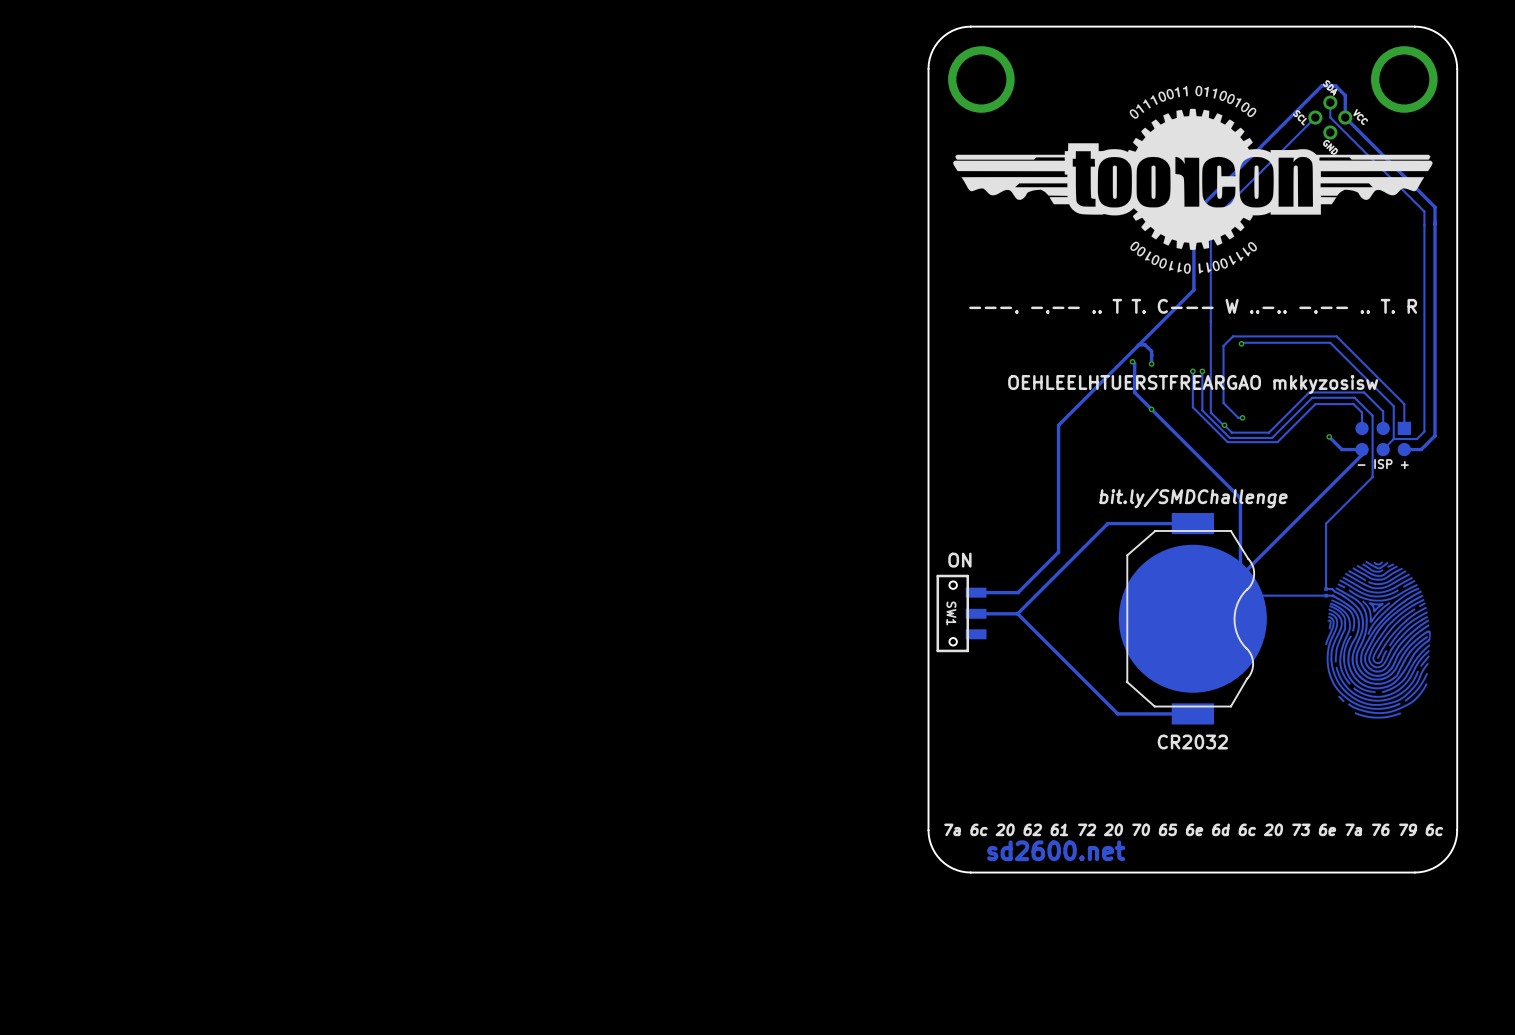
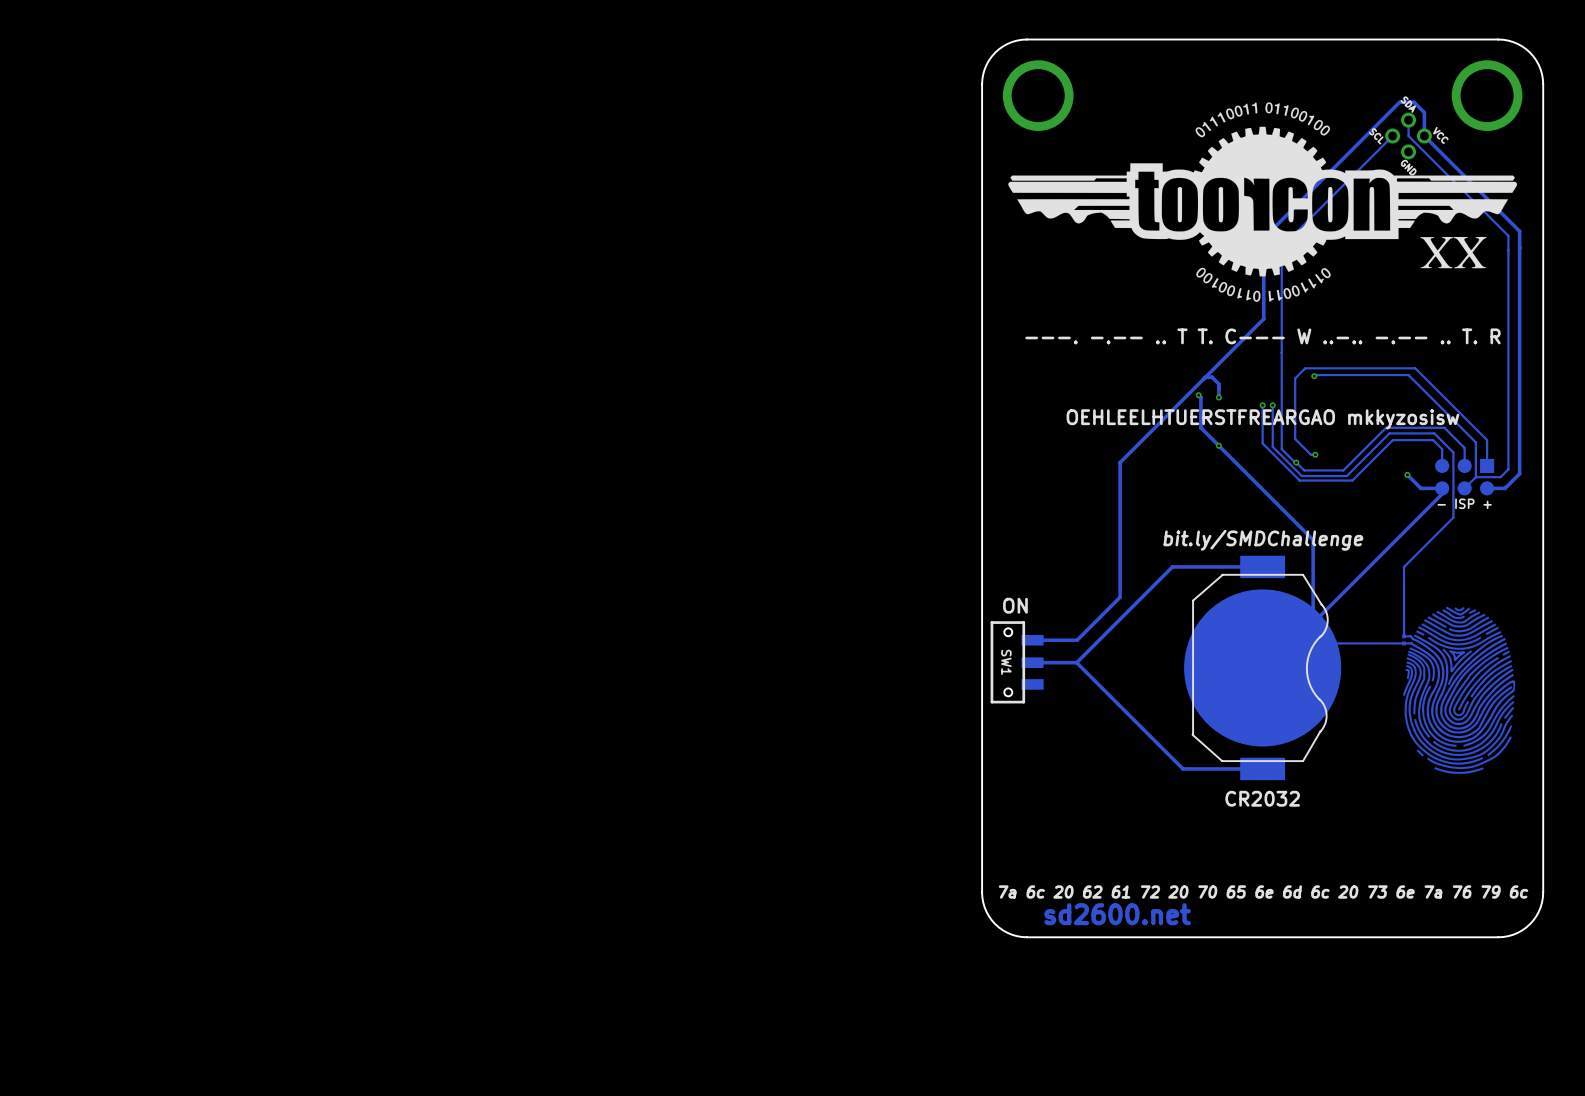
drawing: none -> [1420, 236, 1487, 269]

